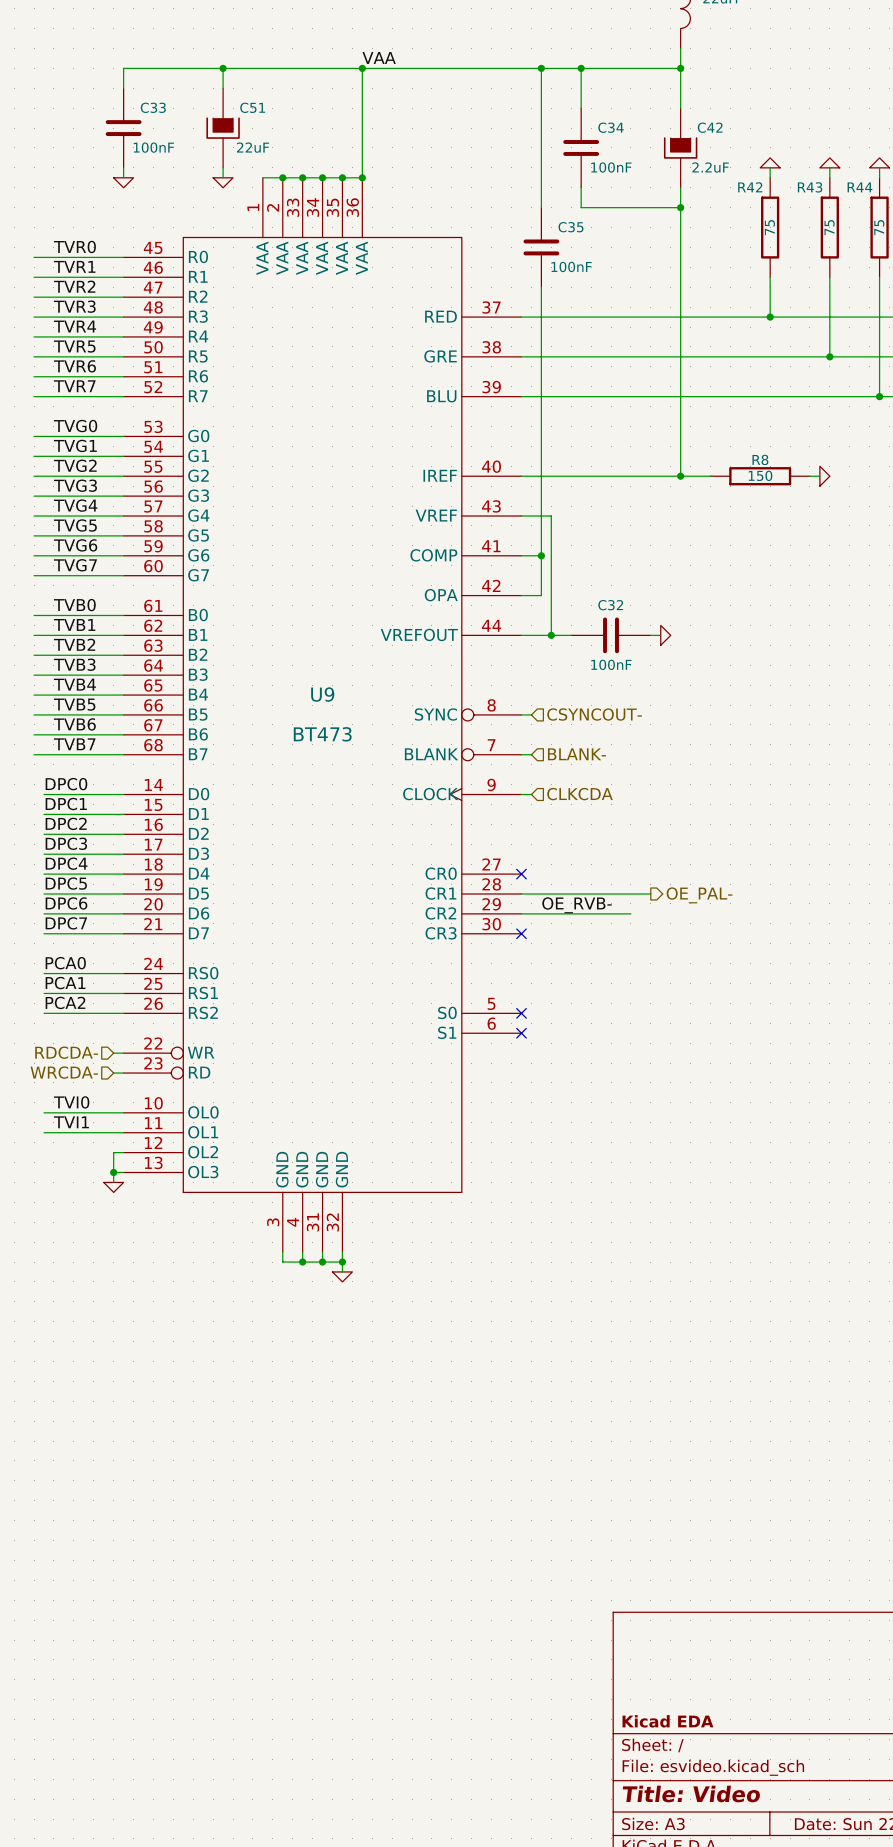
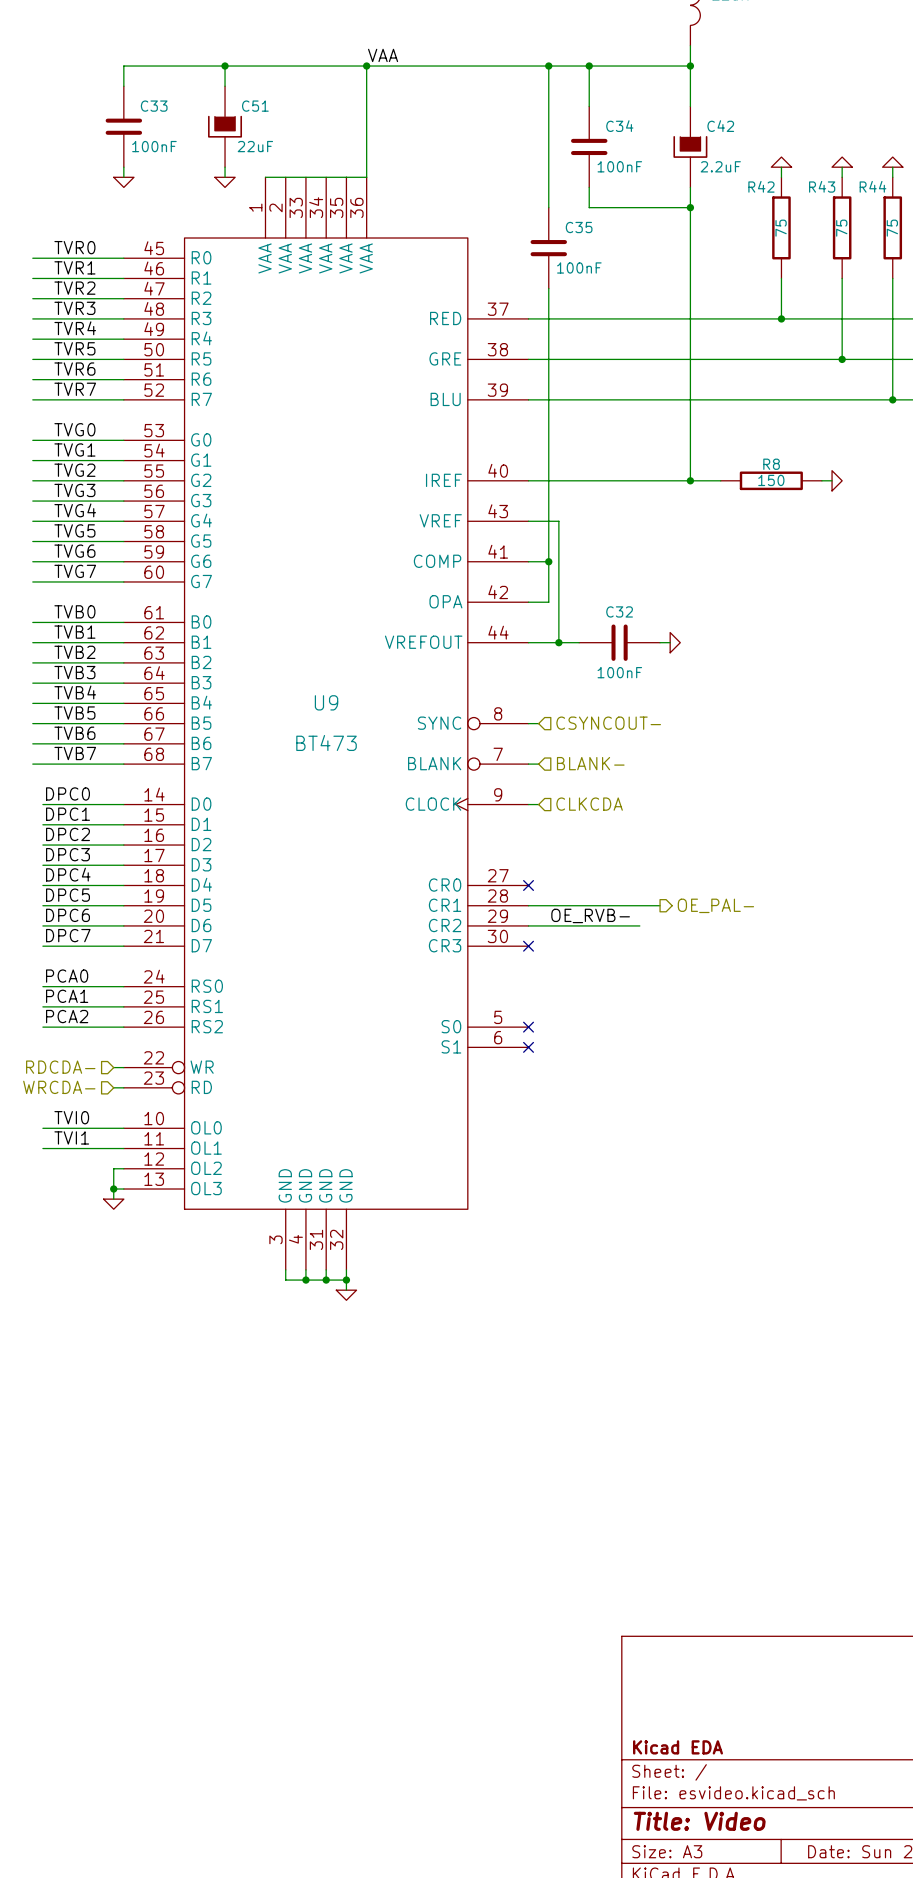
junction: (282, 177) -> none
junction: (302, 177) -> none
junction: (322, 177) -> none
junction: (342, 177) -> none
junction: (362, 177) -> none

